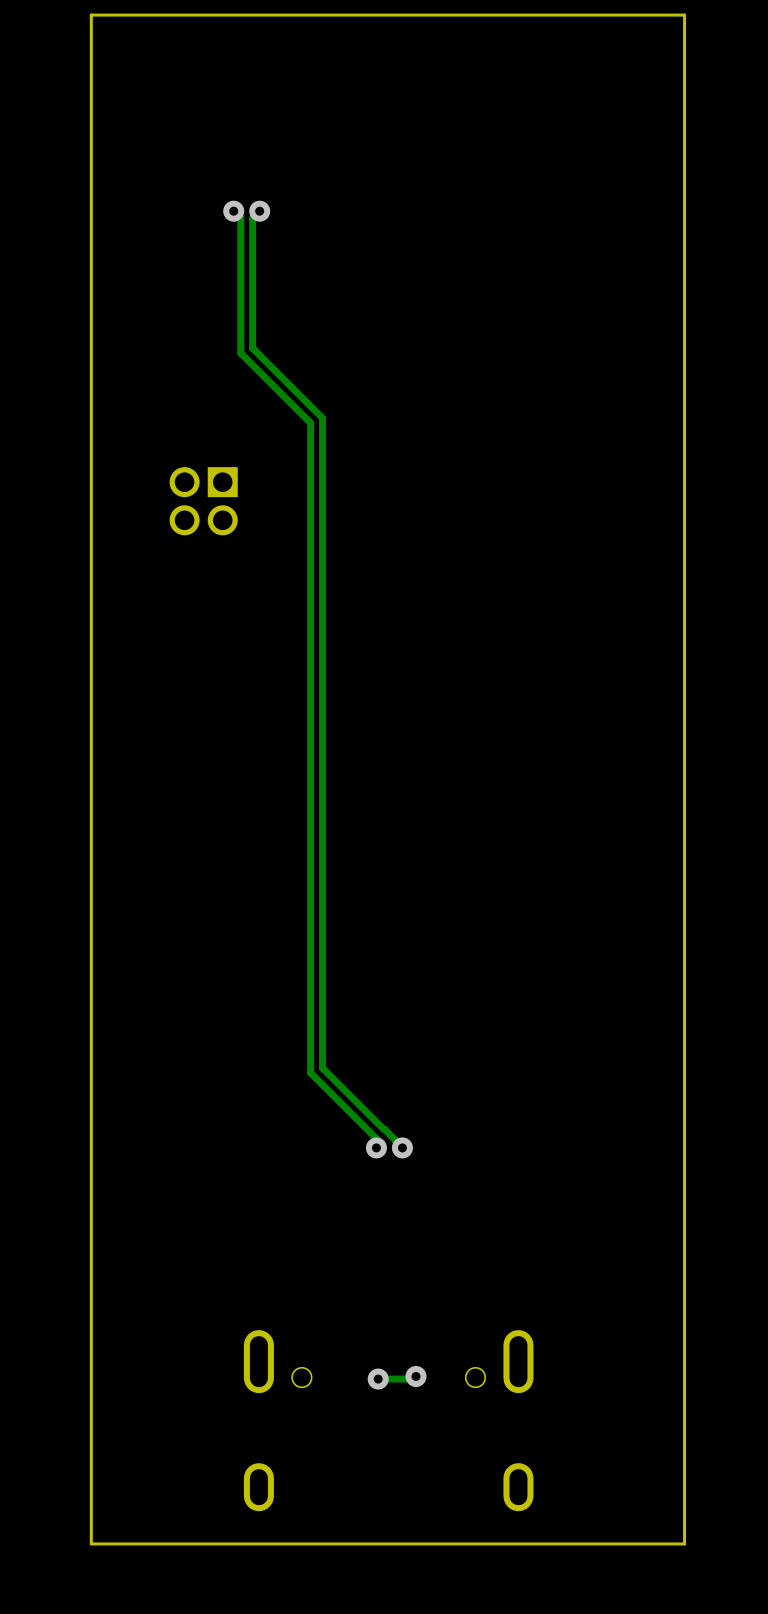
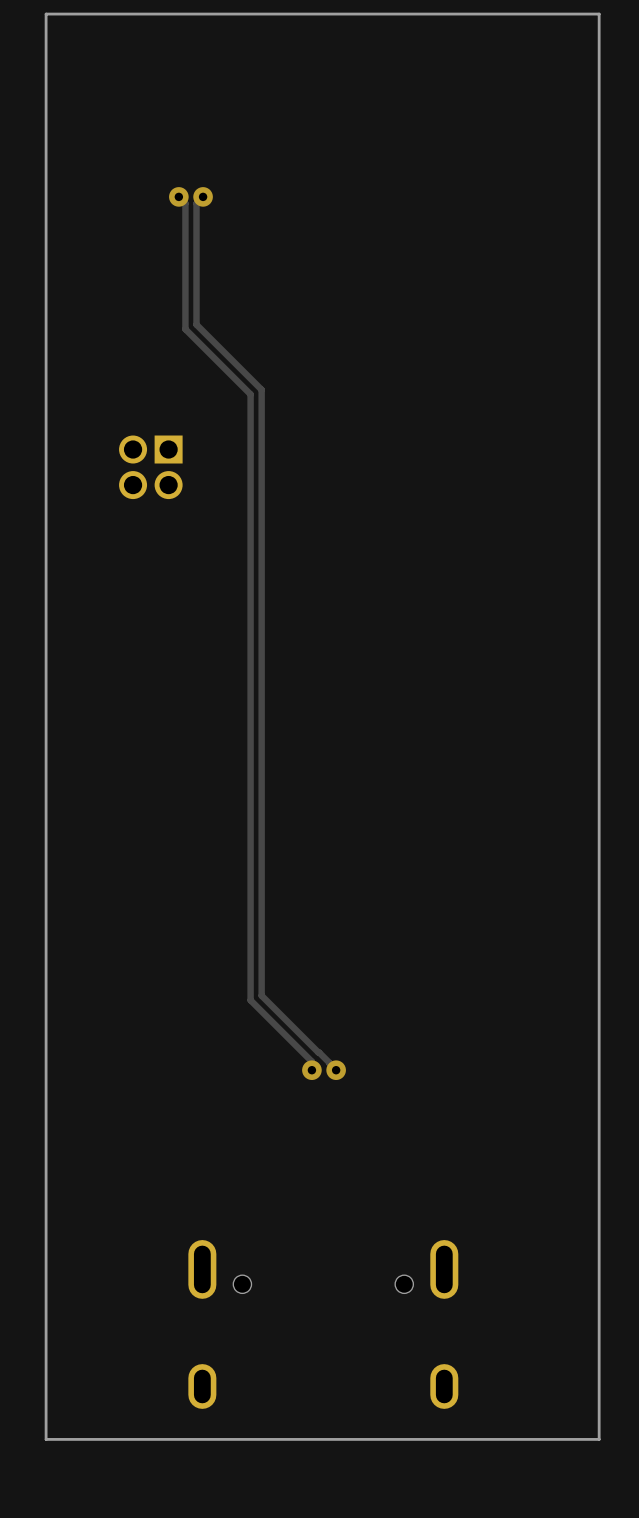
track: (416, 1376) (413, 1379) (378, 1379) -> none
via: (416, 1376) -> none
via: (378, 1379) -> none

